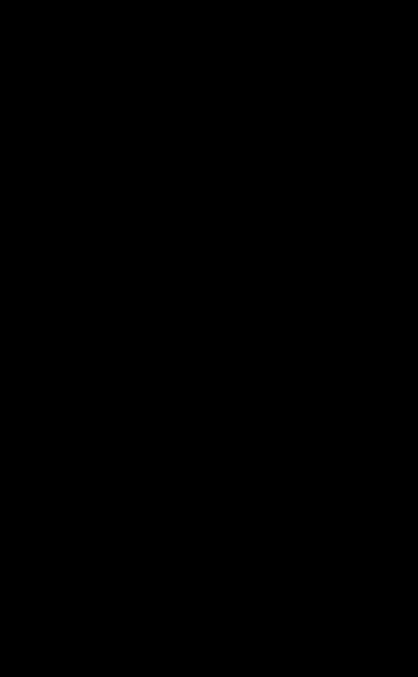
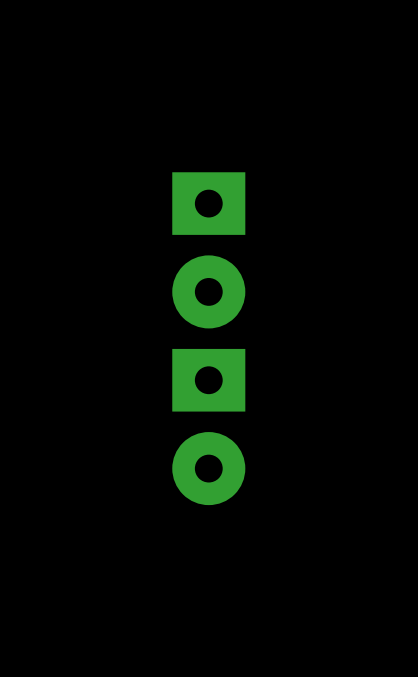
part: none -> (208, 250)
part: none -> (208, 427)

